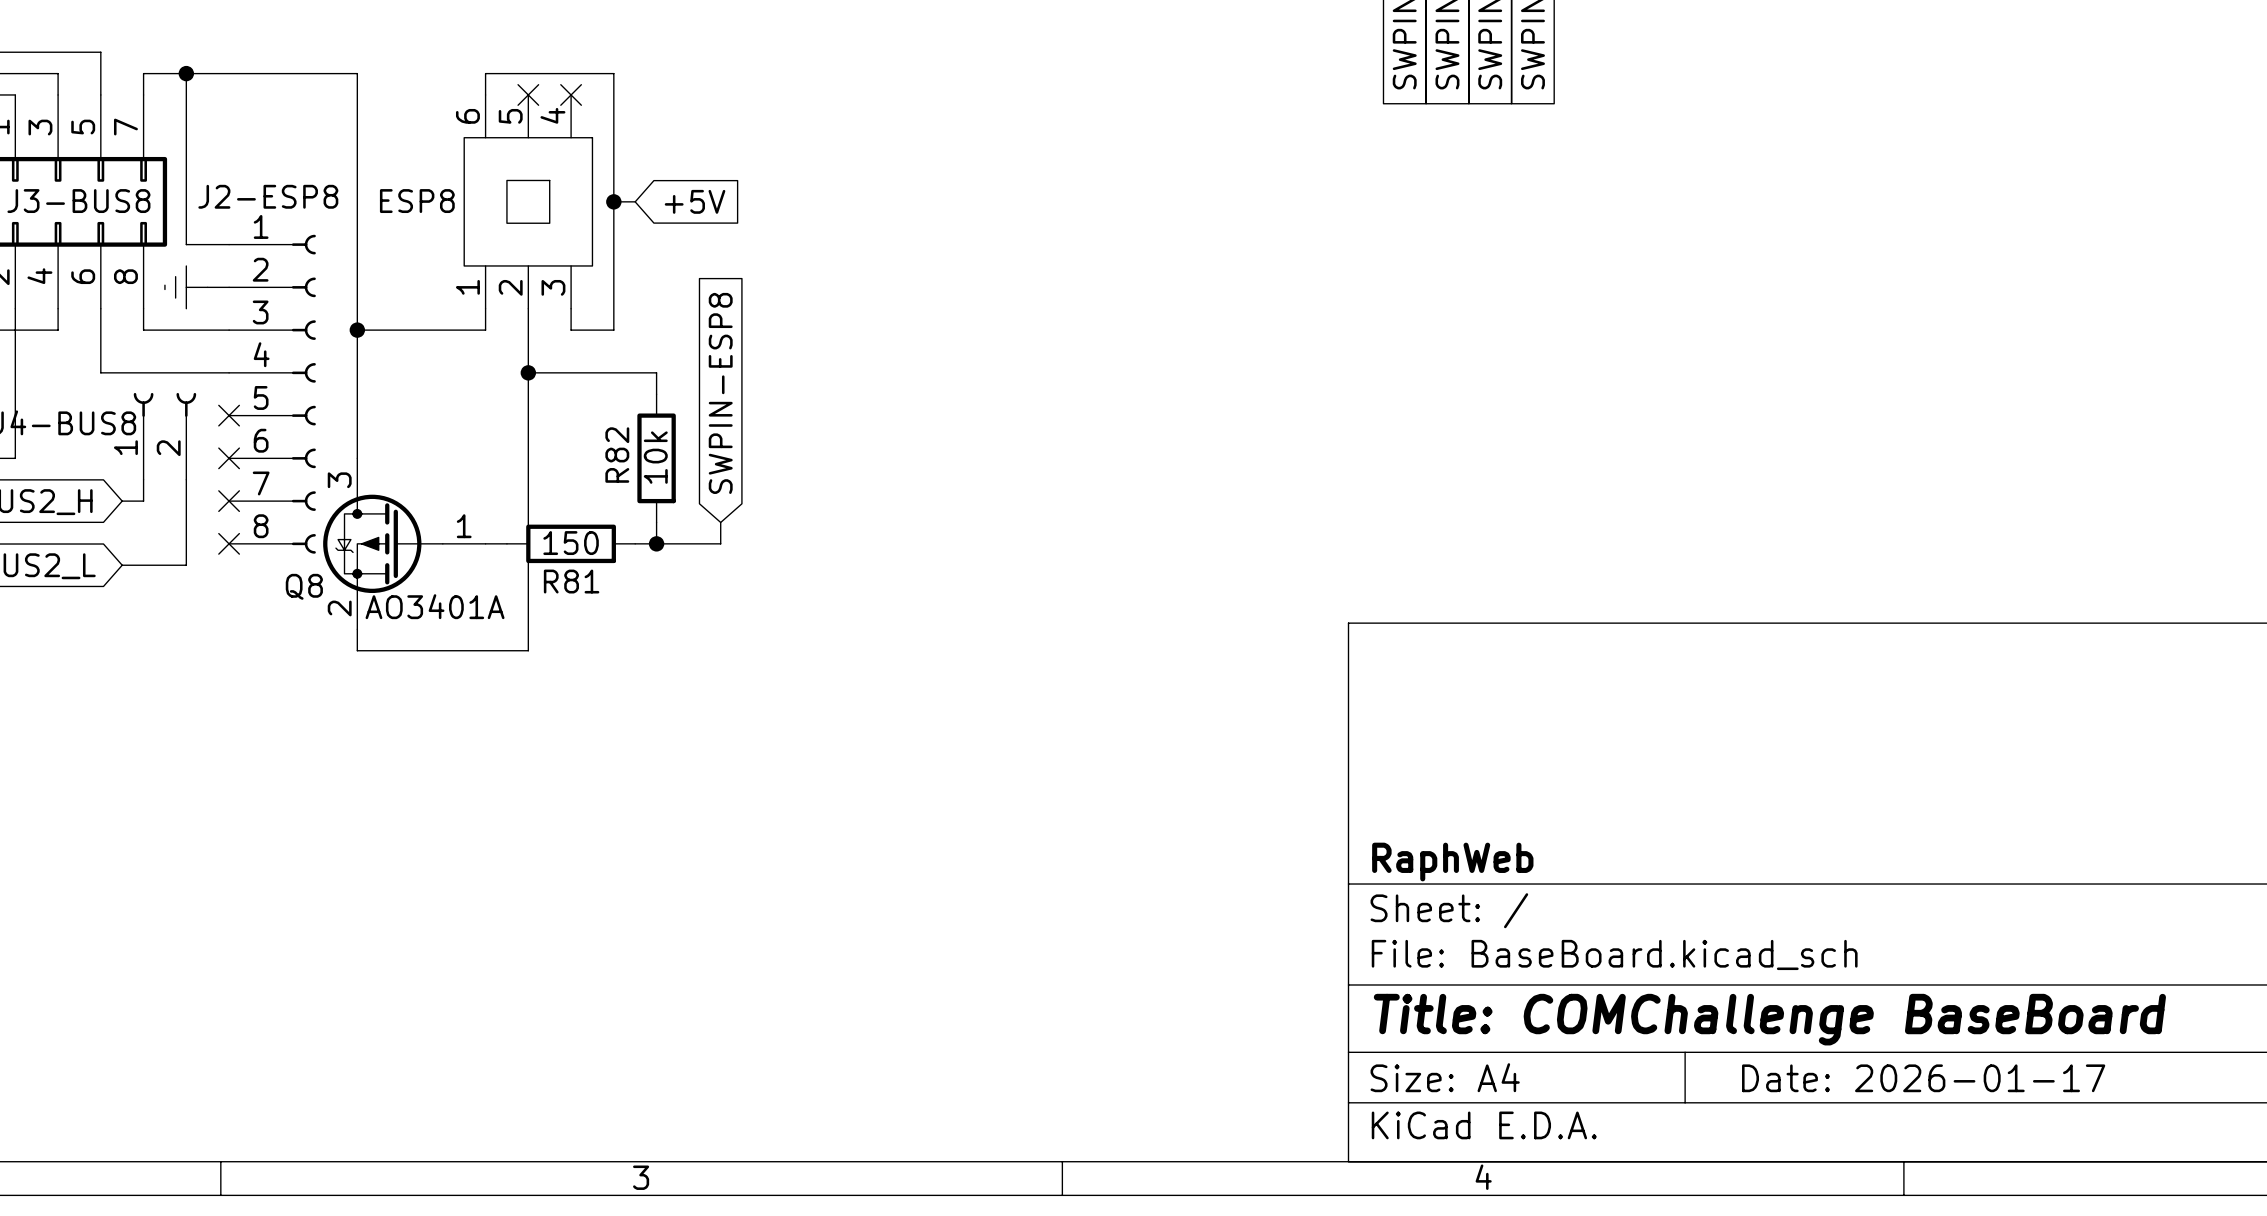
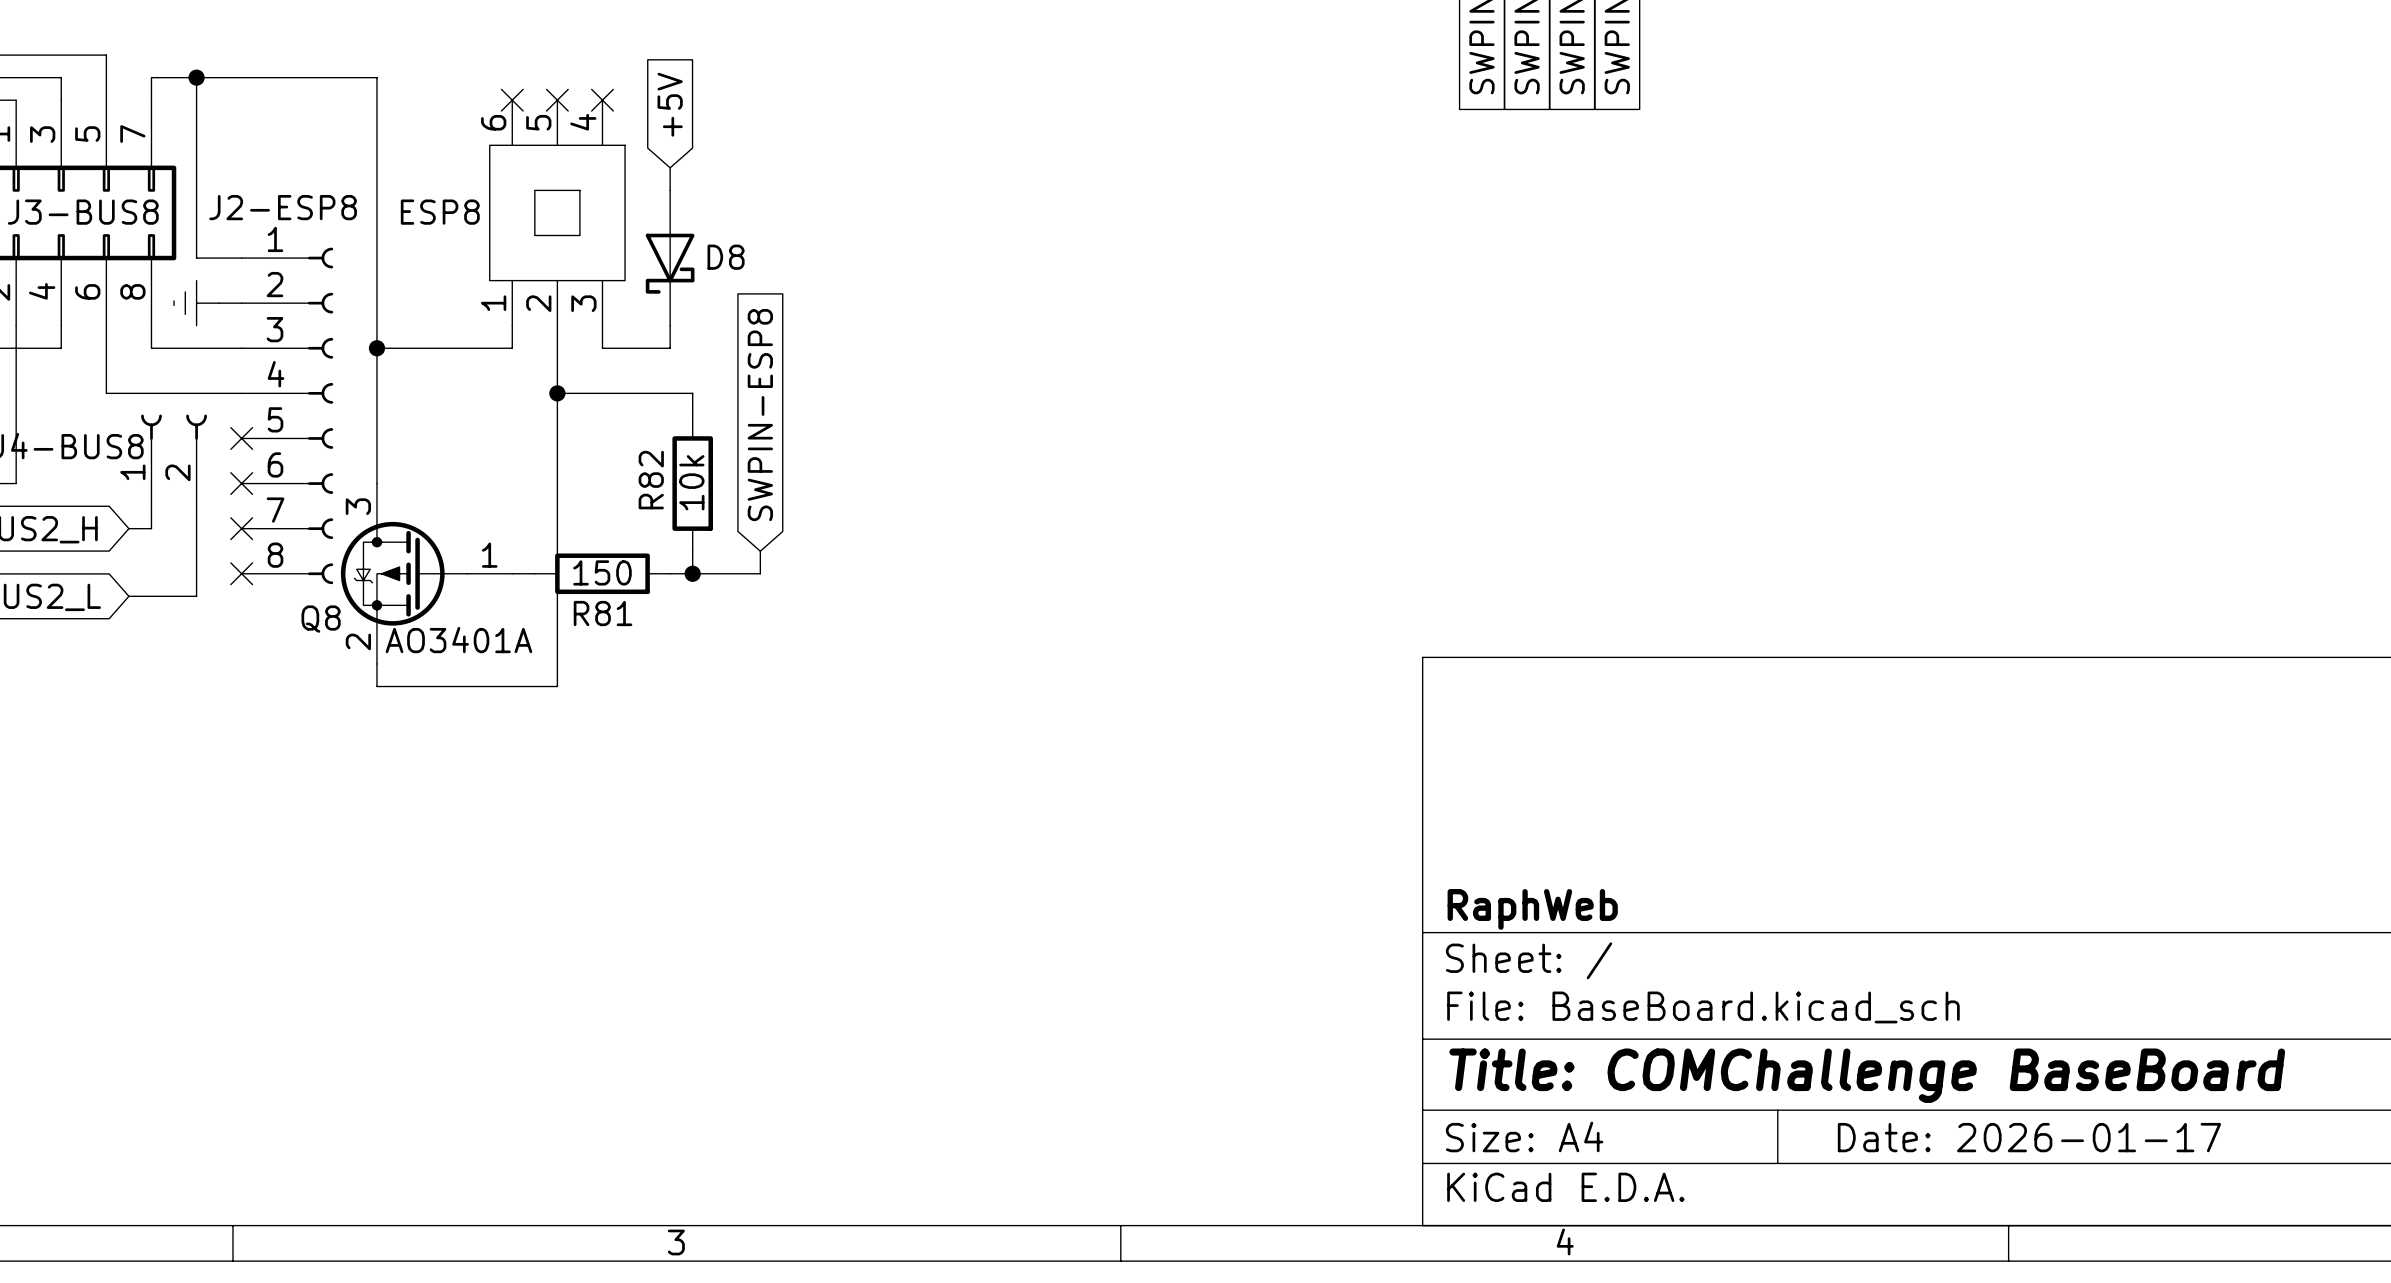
wire: (485, 94) (485, 73) (613, 73) (613, 330) -> (670, 325) (670, 348) (647, 348)
no-connect mark: none -> (512, 100)
wire: none -> (670, 167) (670, 190)
wire: (613, 201) (635, 201) -> none
junction: (613, 201) -> none
global label rotation: 0° (695, 201) -> 90° counterclockwise (670, 104)
D8: none -> (670, 258)

